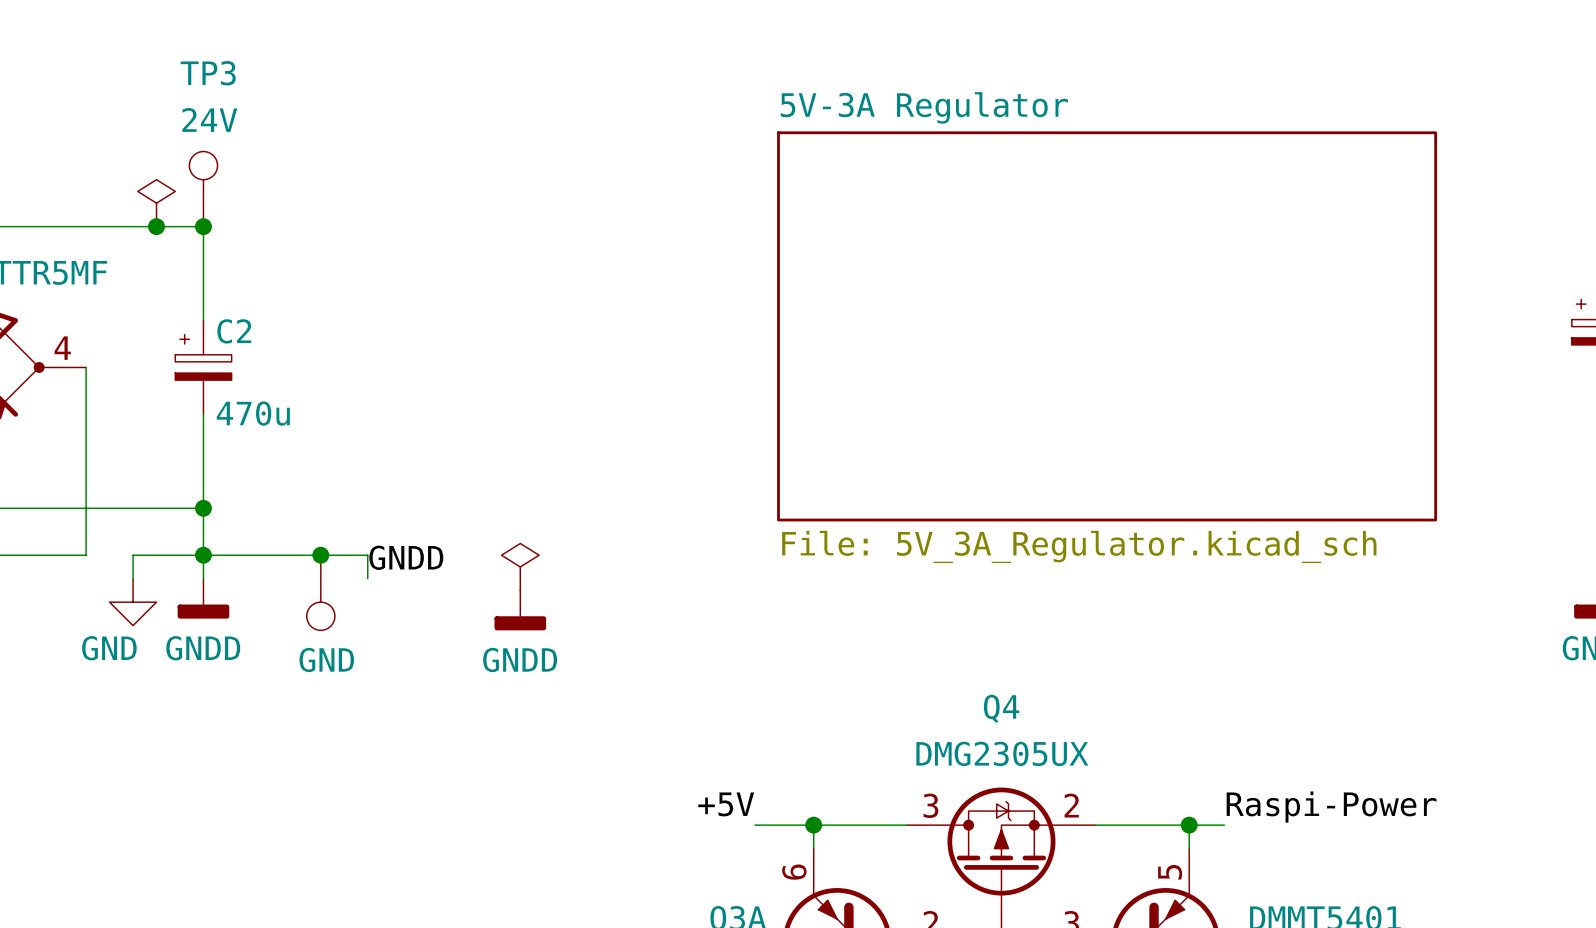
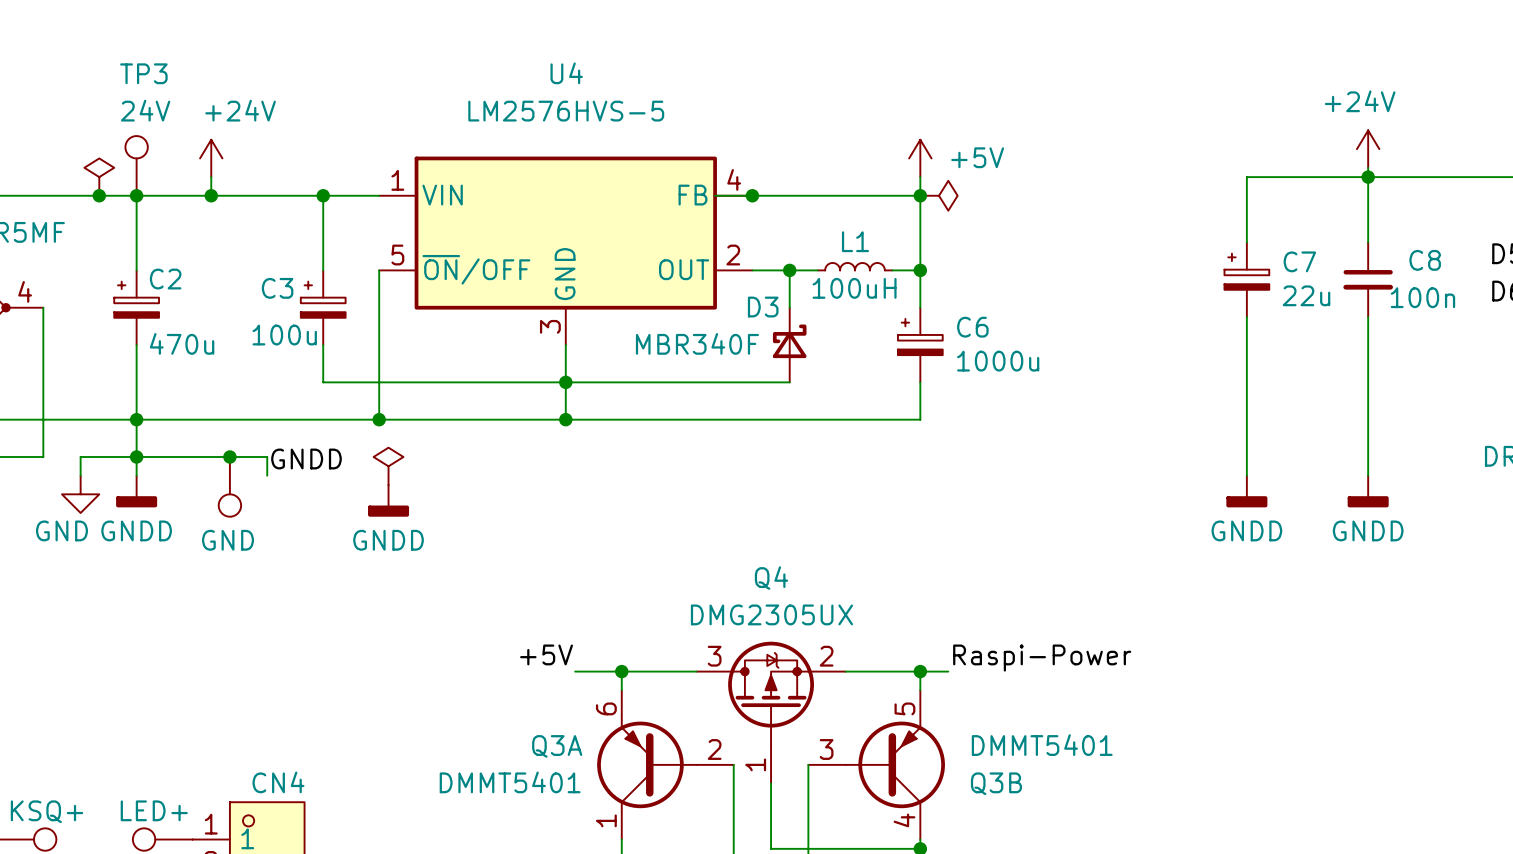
power symbol: none -> +24V (211, 158)
power symbol: none -> +5V (920, 158)
wire: none -> (211, 177) (211, 195)
wire: none -> (920, 177) (920, 307)
wire: none -> (136, 195) (379, 195)
junction: none -> (211, 195)
wire: none -> (323, 195) (323, 270)
junction: none -> (323, 195)
wire: none -> (715, 195) (920, 195)
junction: none -> (752, 195)
junction: none -> (920, 195)
power symbol: none -> (938, 195)
U4: none -> LM2576HVS-5 (565, 250)
L1: none -> 100uH (855, 266)
wire: none -> (379, 270) (379, 419)
wire: none -> (752, 270) (817, 270)
wire: none -> (789, 270) (789, 307)
junction: none -> (789, 270)
wire: none -> (892, 270) (920, 270)
junction: none -> (920, 270)
sheet 5V-3A Regulator: File: 5V_3A_Regulator.kicad_sch (1107, 326) -> none
C3: none -> 100u (323, 307)
wire: none -> (323, 345) (323, 382) (789, 382)
wire: none -> (565, 345) (565, 419)
D3: none -> MBR340F (789, 345)
C6: none -> 1000u (920, 345)
junction: none -> (565, 382)
wire: none -> (920, 382) (920, 419) (136, 419)
junction: none -> (379, 419)
junction: none -> (565, 419)

